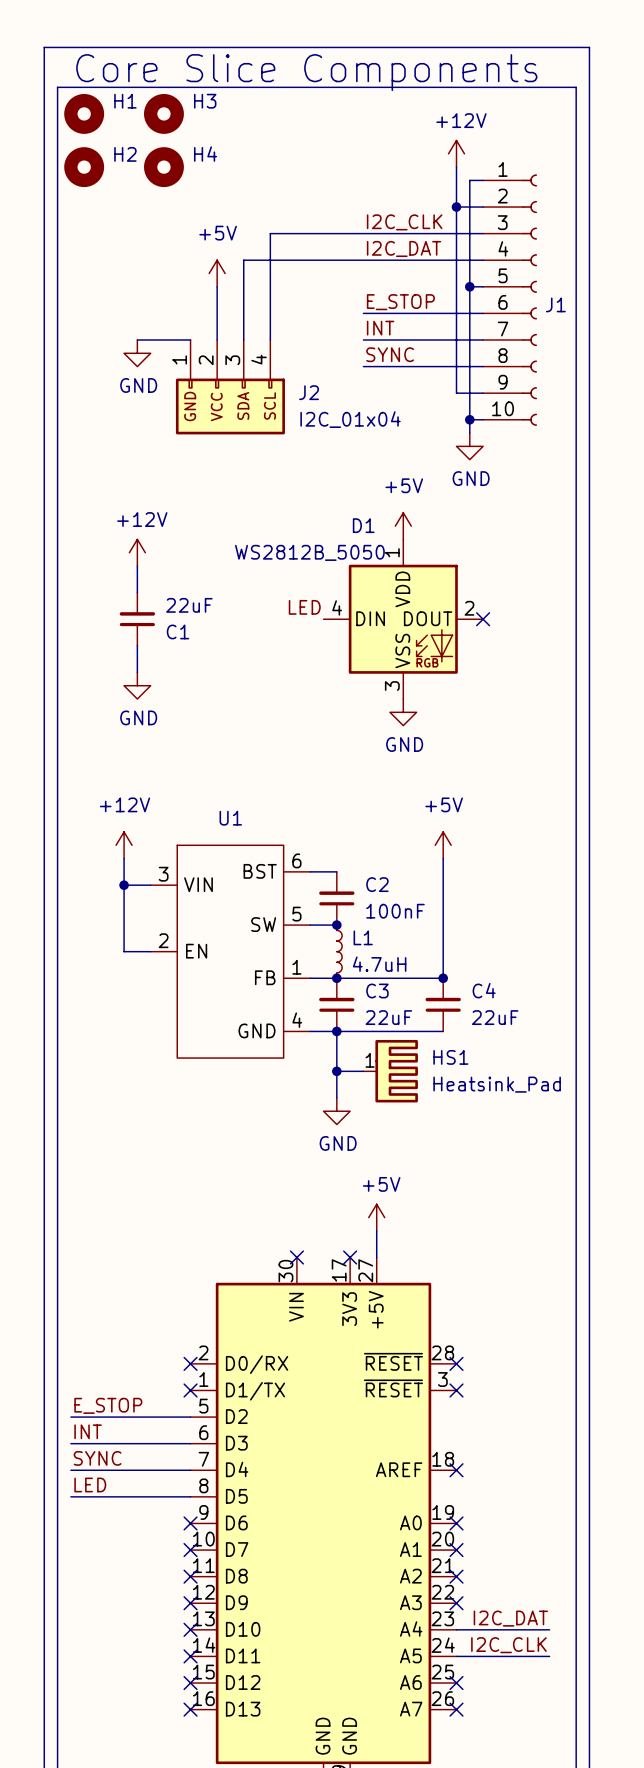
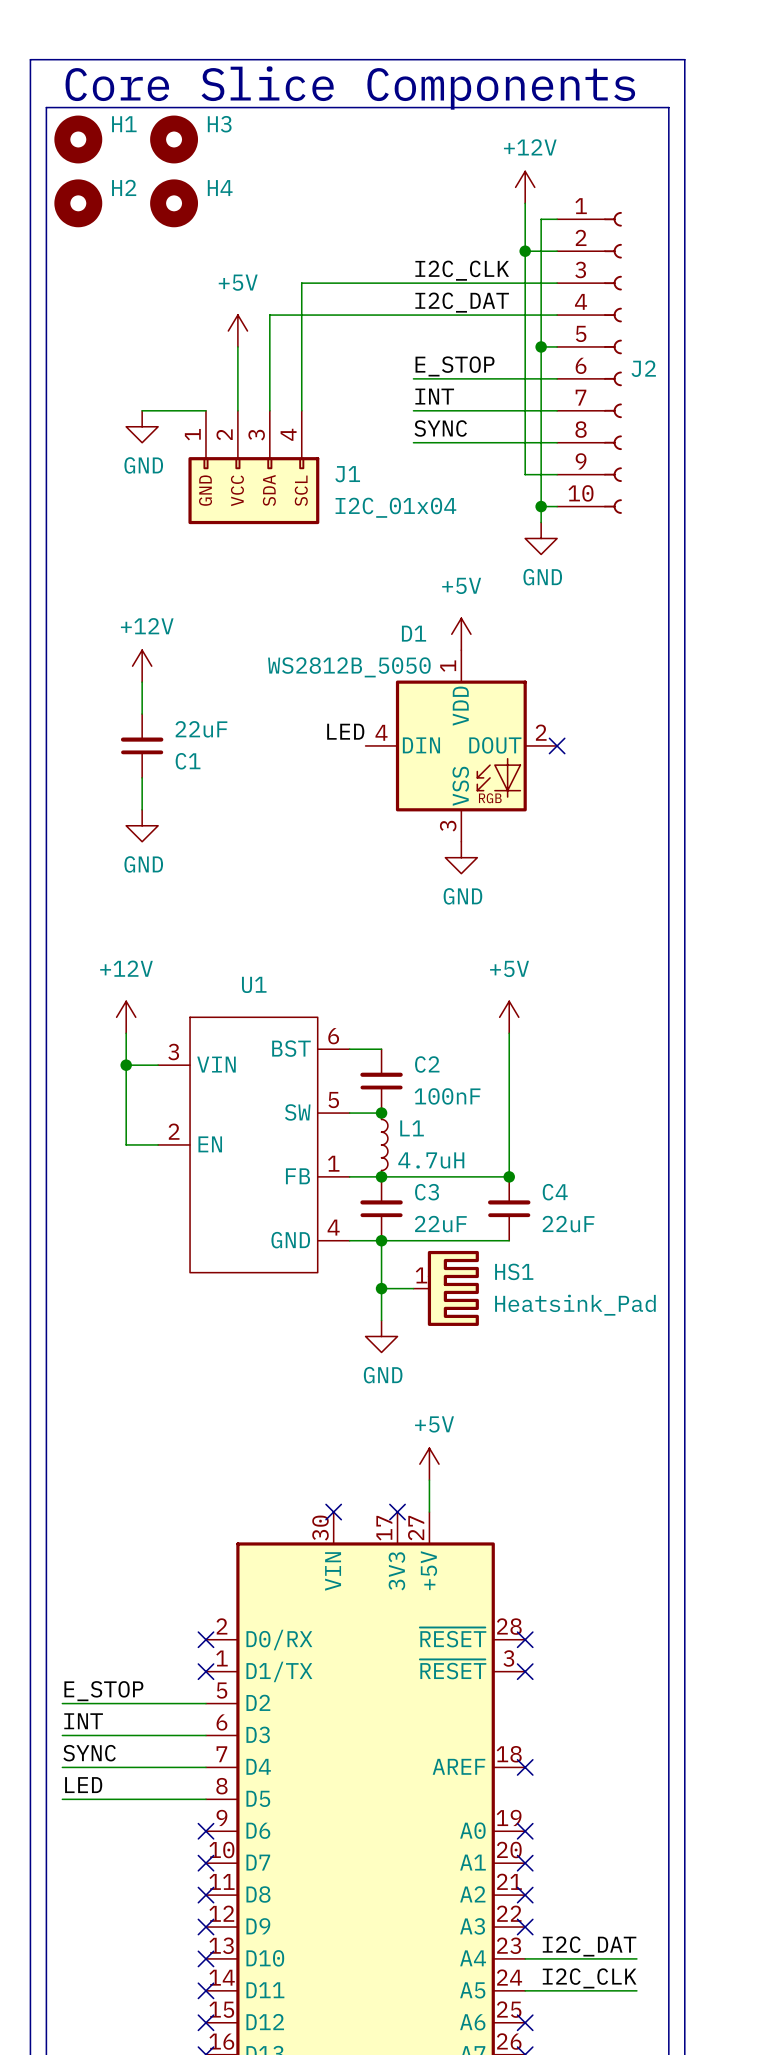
J1 name: J1 (555, 304) -> J2 (643, 368)
J2 name: J2 (309, 392) -> J1 (347, 474)

